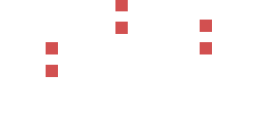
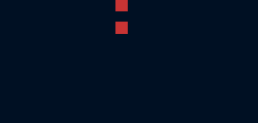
part: (205, 37) -> none
part: (51, 59) -> none

